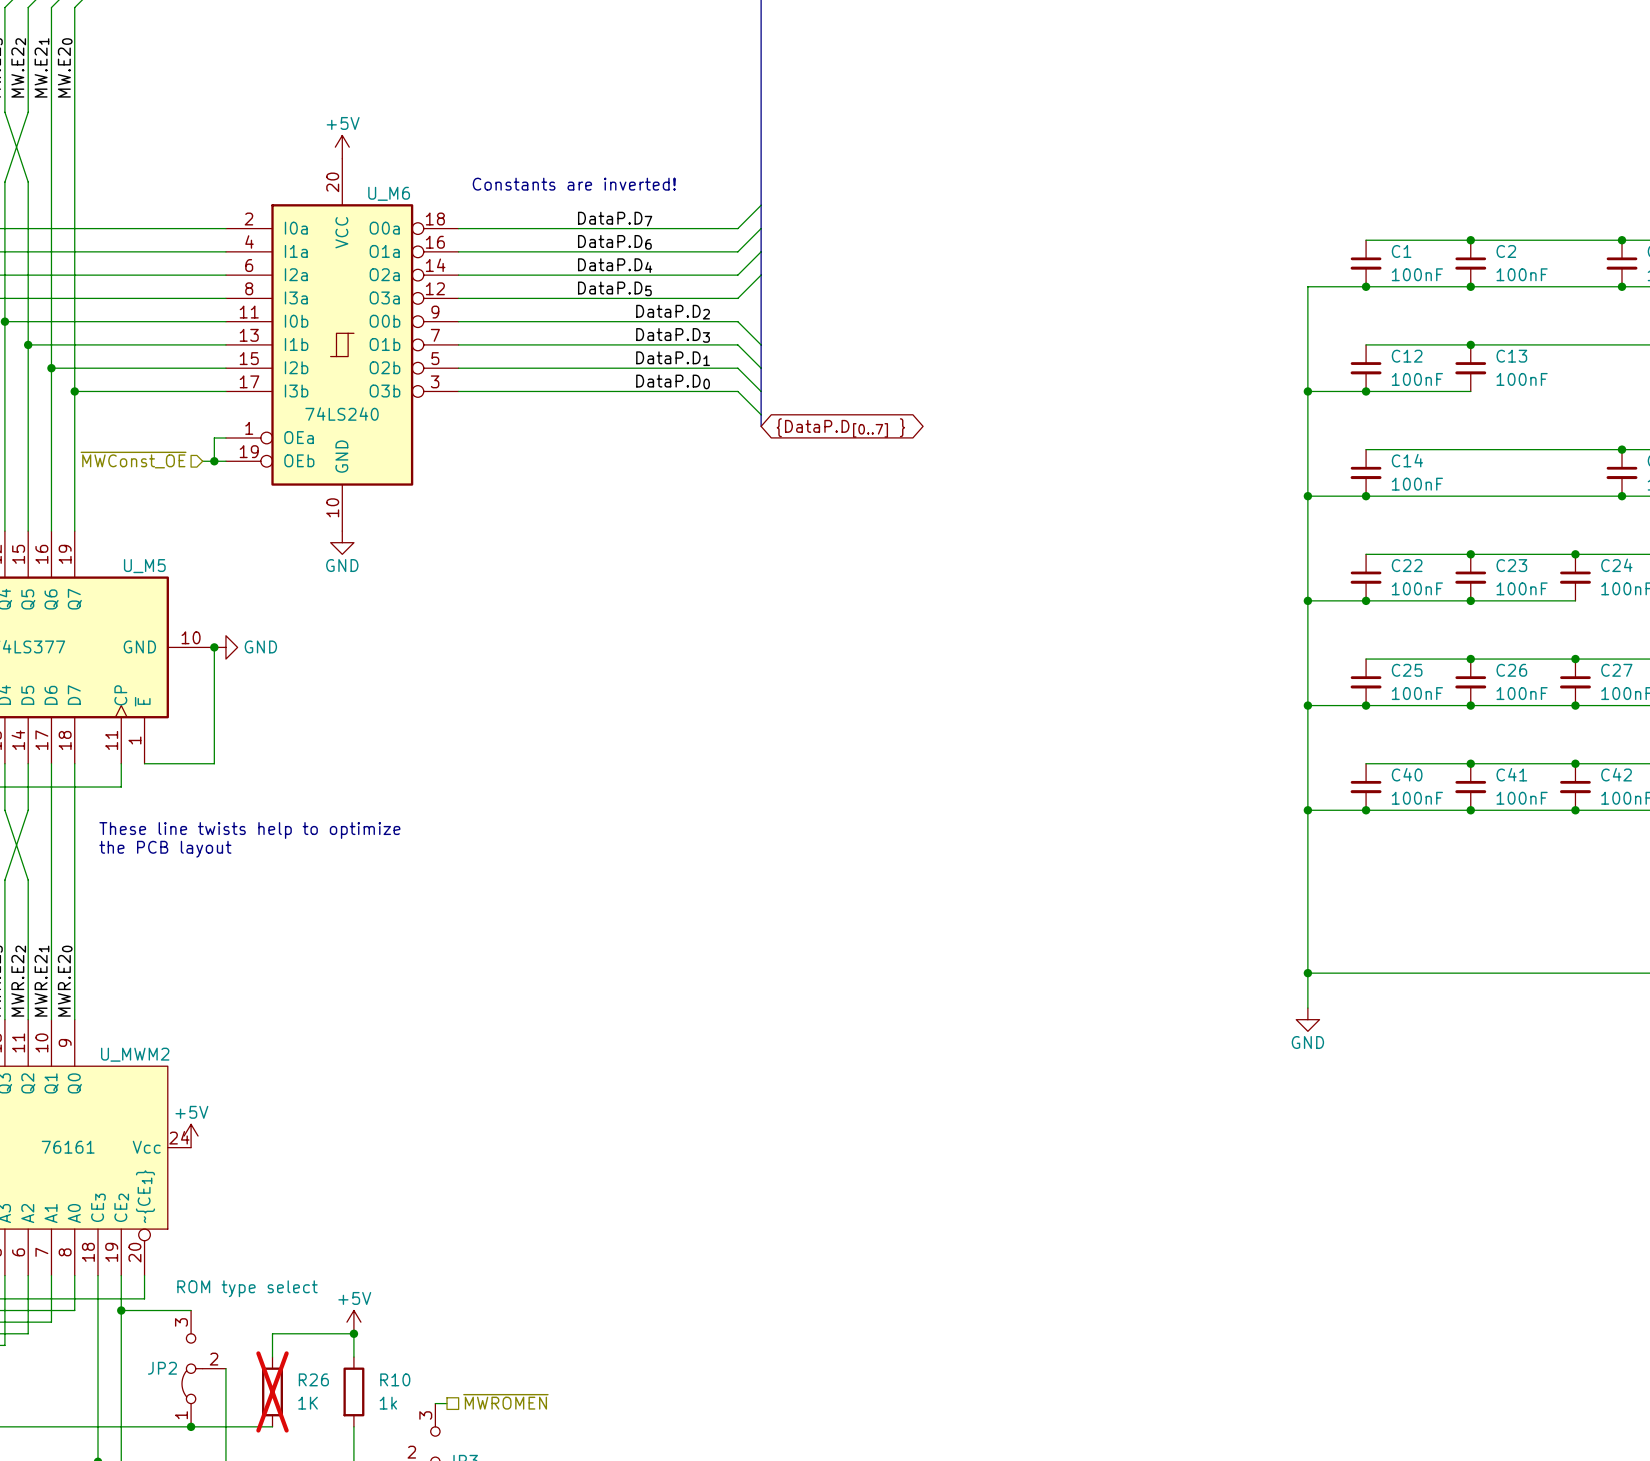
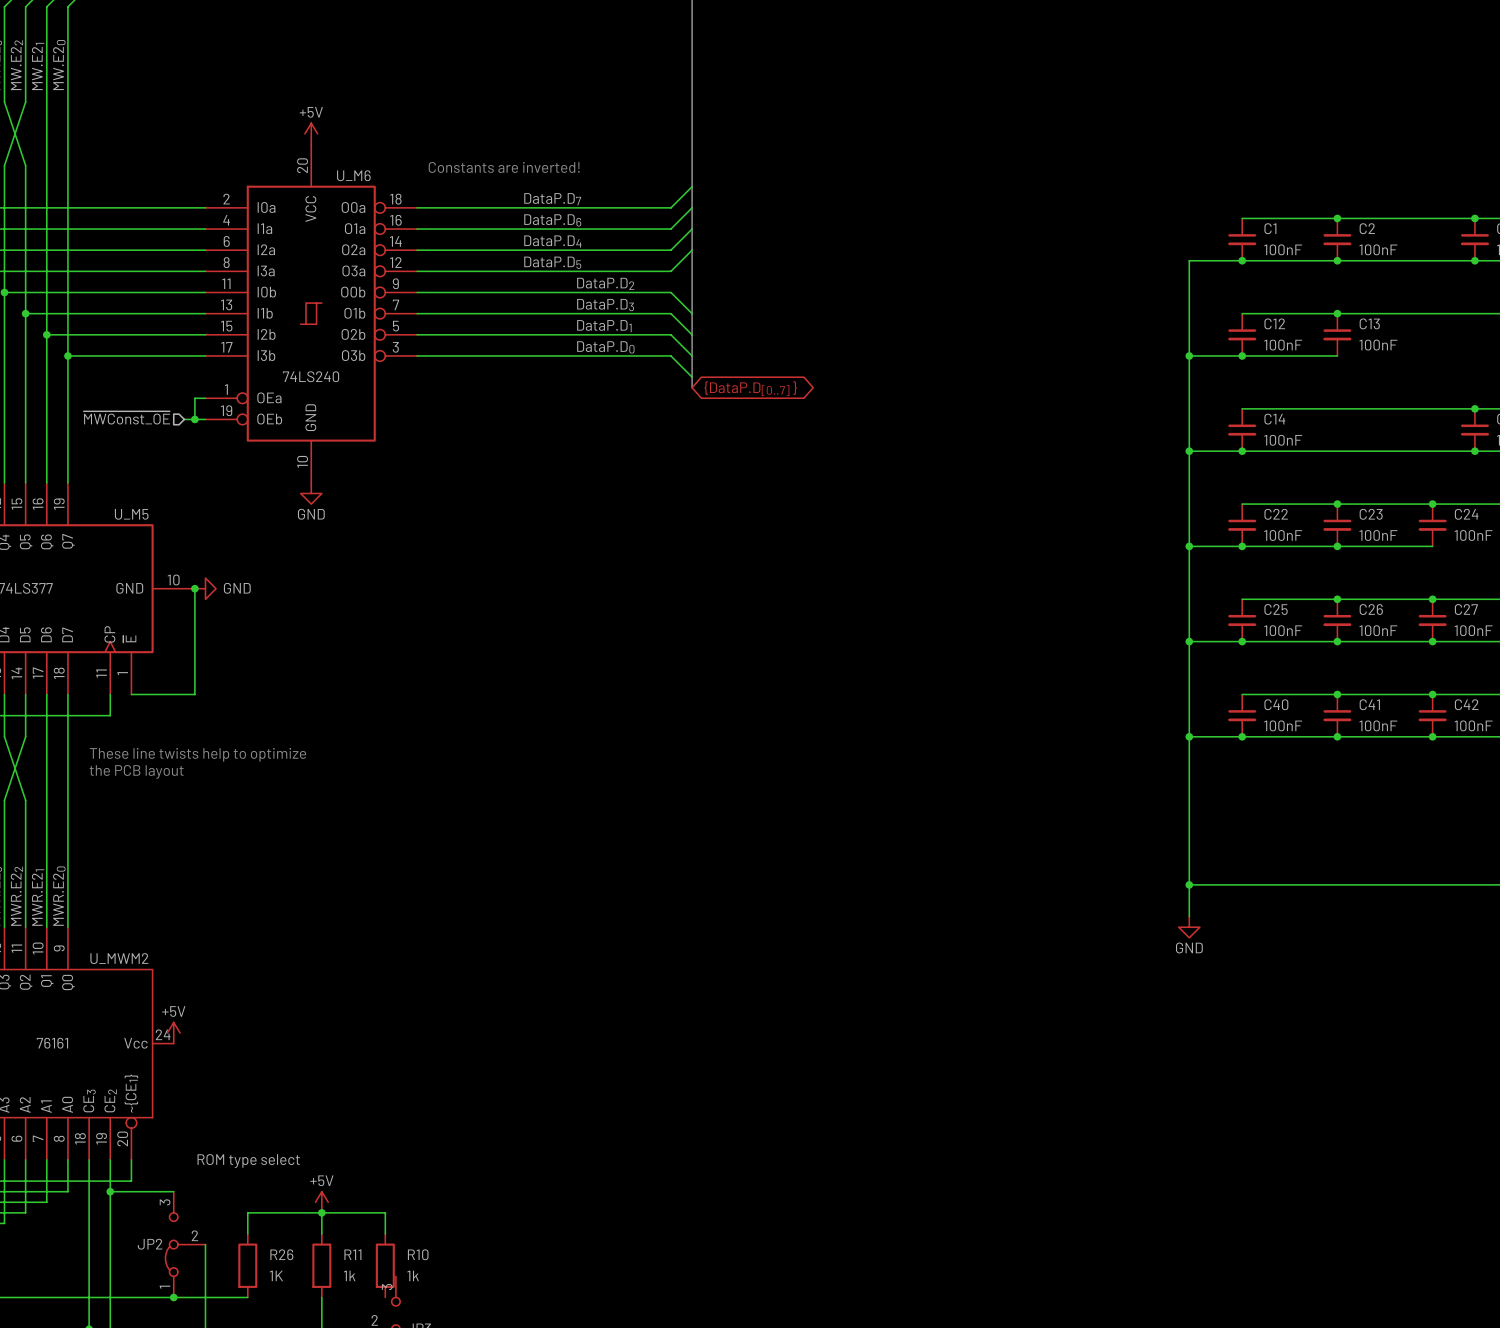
JP2 value position: ROM type select (247, 1288) -> ROM type select (248, 1161)
wire: none -> (321, 1212) (385, 1212) (385, 1234)
R10 name: R10 (395, 1379) -> R11 (352, 1254)
R26 do-not-place cross: (272, 1391) -> none
R10: none -> 1k (385, 1265)
hierarchical label: ~{MWROMEN} (505, 1401) -> none
wire: (435, 1403) (447, 1403) -> none

